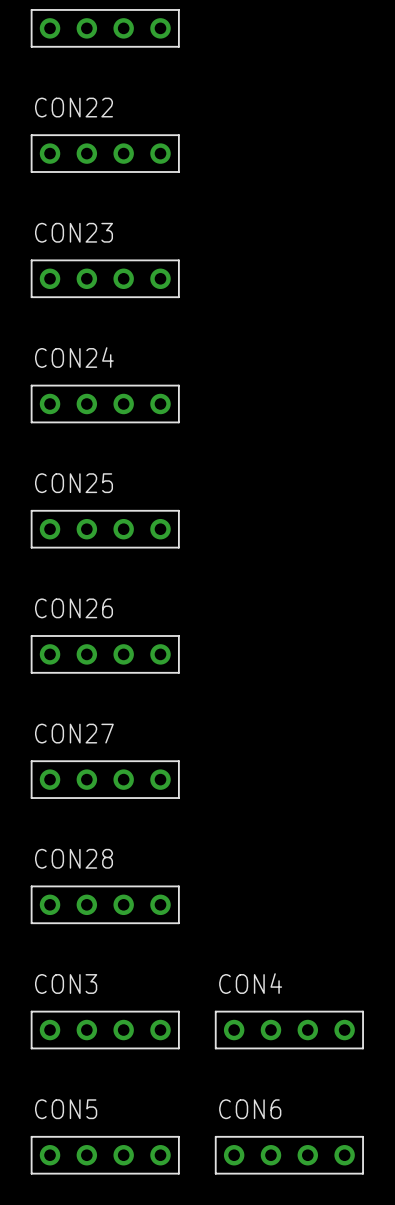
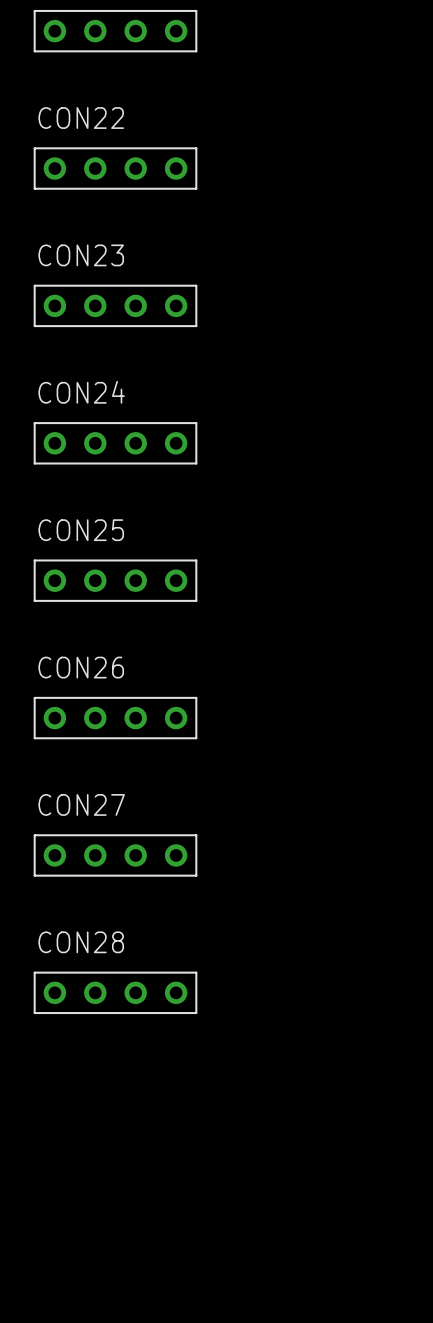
CON3: (105, 1030) -> none
CON4: (289, 1030) -> none
CON5: (105, 1155) -> none
CON6: (289, 1155) -> none

